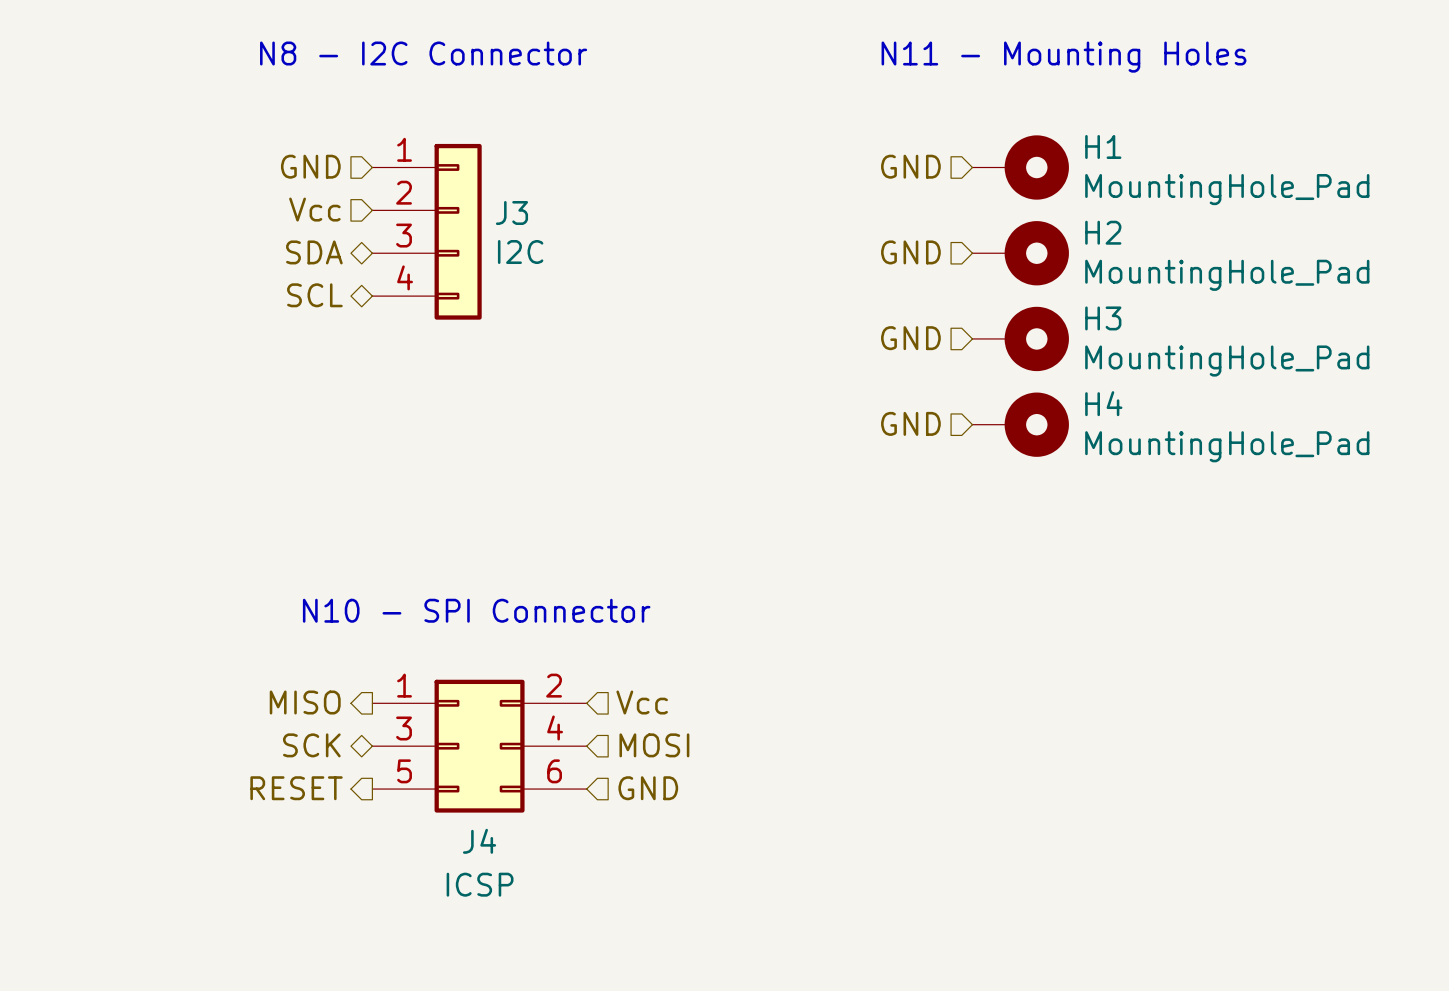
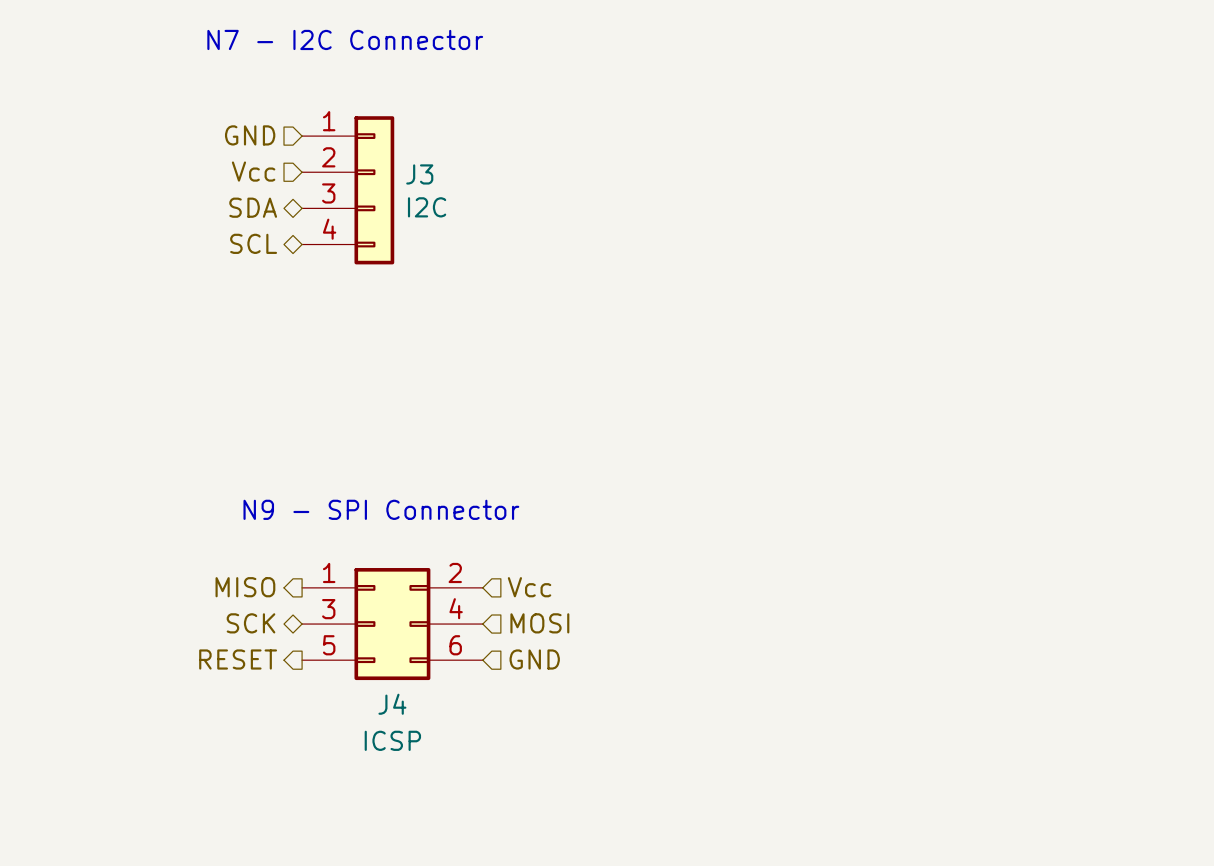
text: N8 - I2C Connector (423, 53) -> N7 - I2C Connector (345, 39)
text: N11 - Mounting Holes (1063, 57) -> none
hierarchical label: GND (910, 166) -> none
H1: MountingHole_Pad (1020, 167) -> none
hierarchical label: GND (910, 252) -> none
H2: MountingHole_Pad (1020, 253) -> none
hierarchical label: GND (910, 338) -> none
H3: MountingHole_Pad (1020, 338) -> none
hierarchical label: GND (910, 423) -> none
H4: MountingHole_Pad (1020, 424) -> none
text: N10 - SPI Connector (476, 610) -> N9 - SPI Connector (381, 509)

